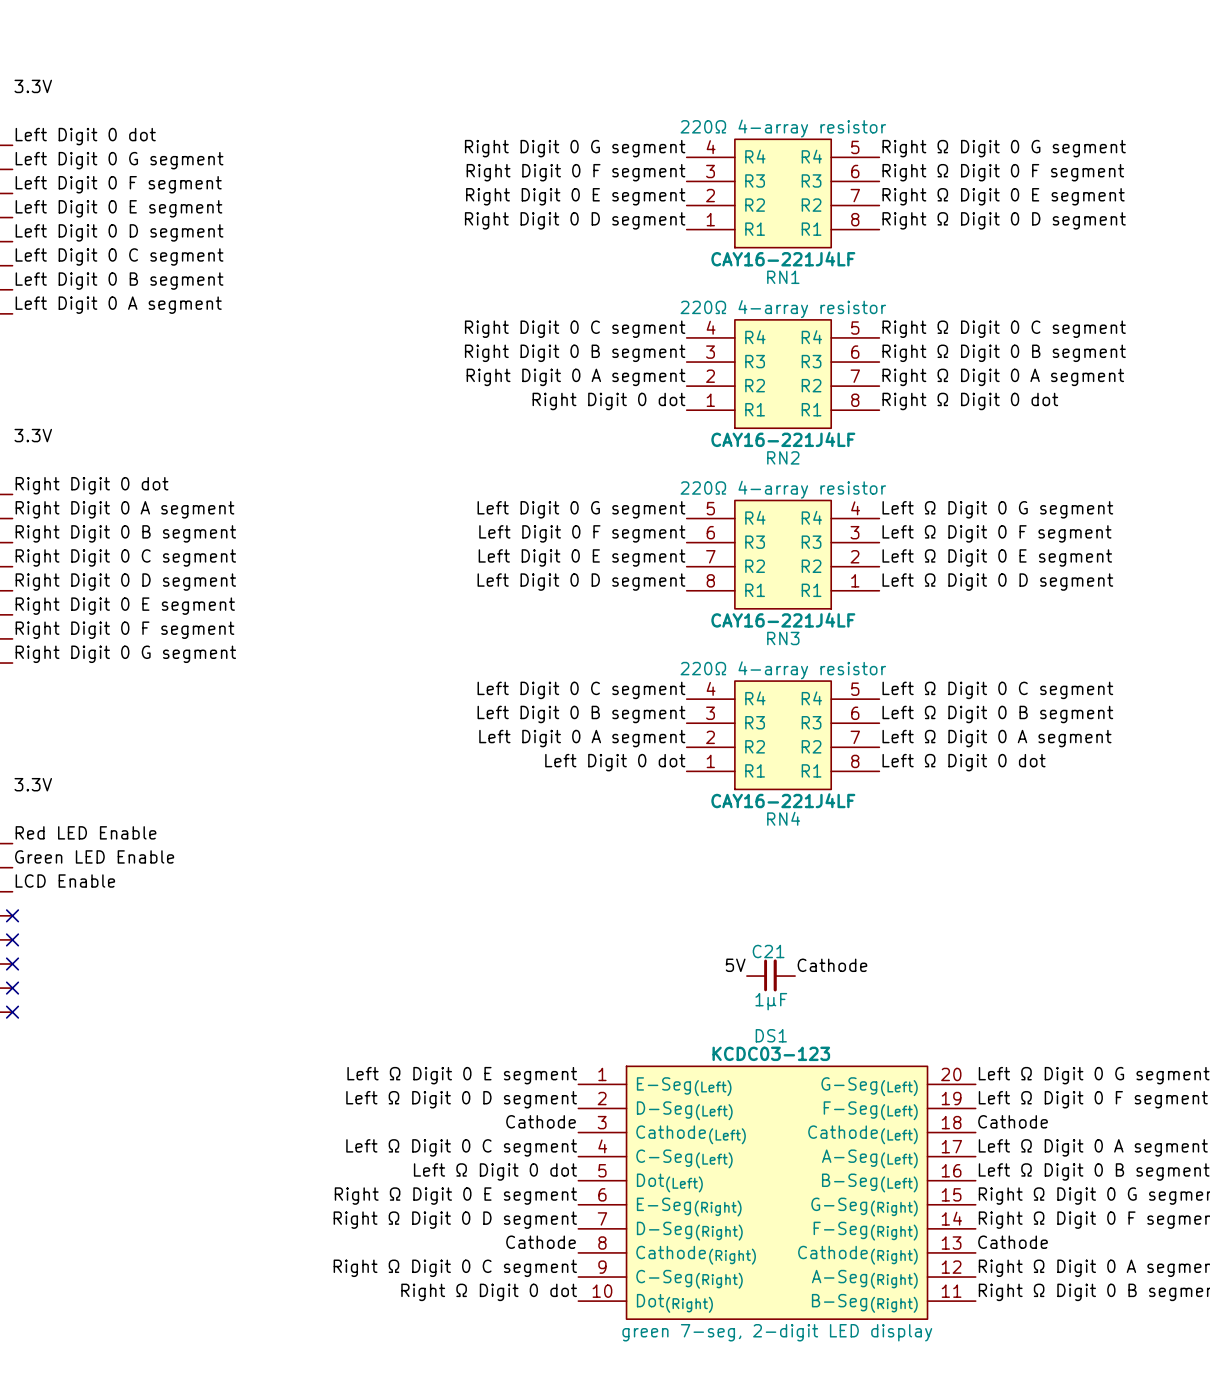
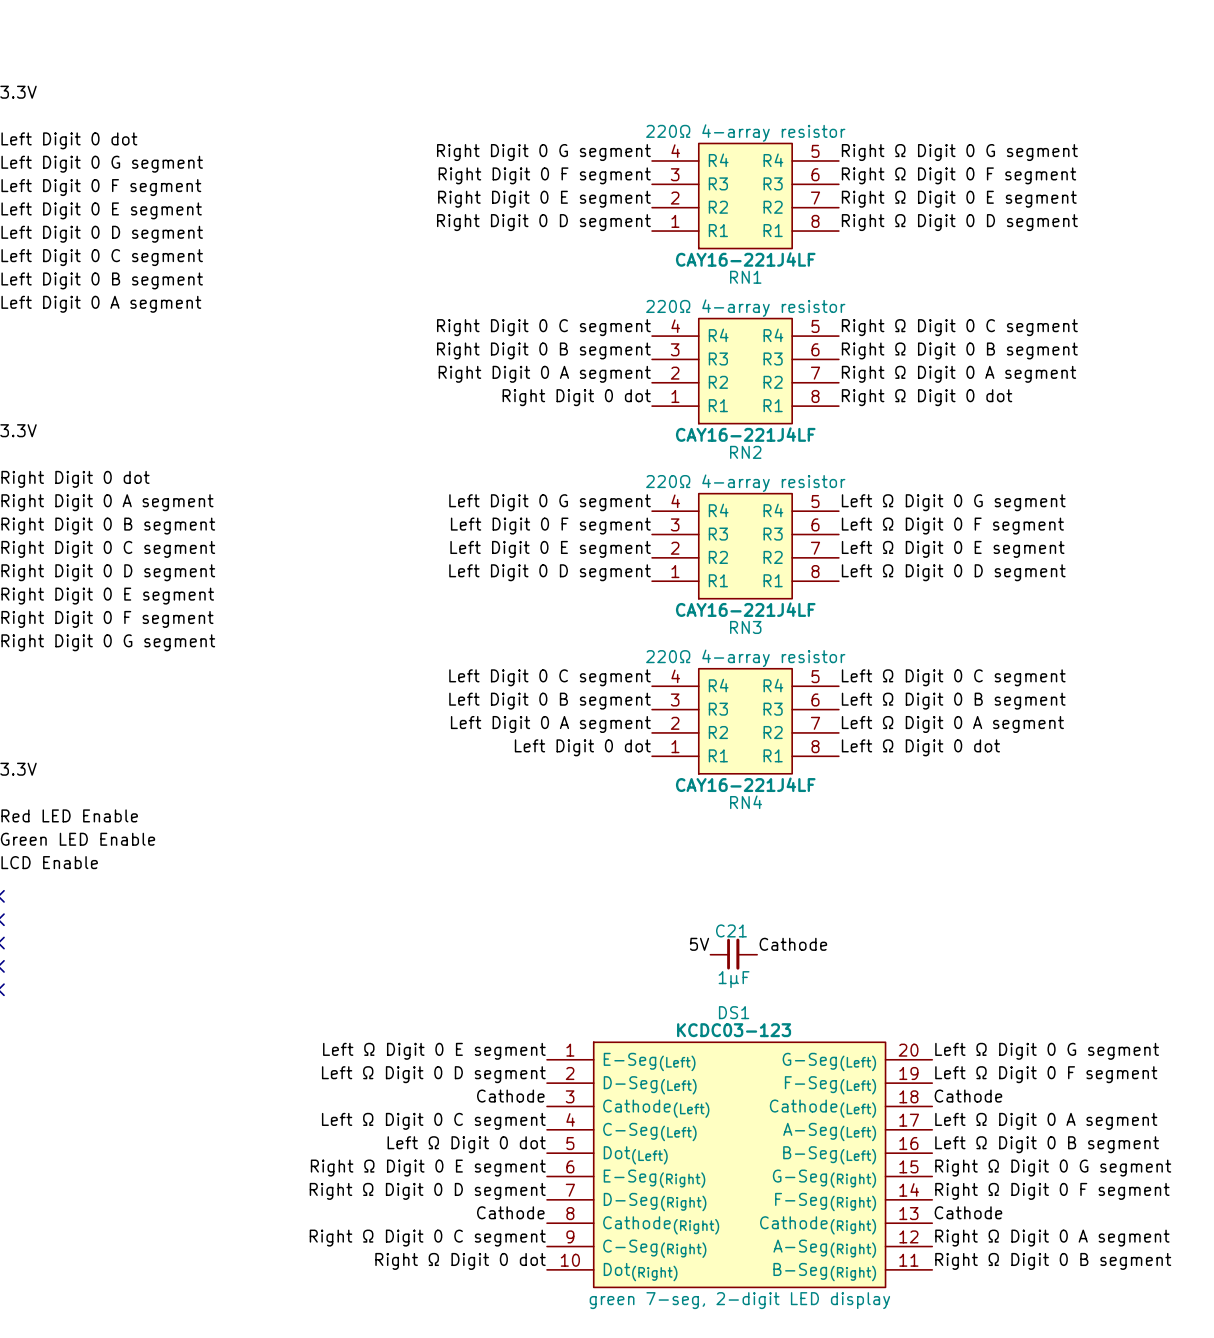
RN3 flip: as is (783, 554) -> left-right (745, 546)

